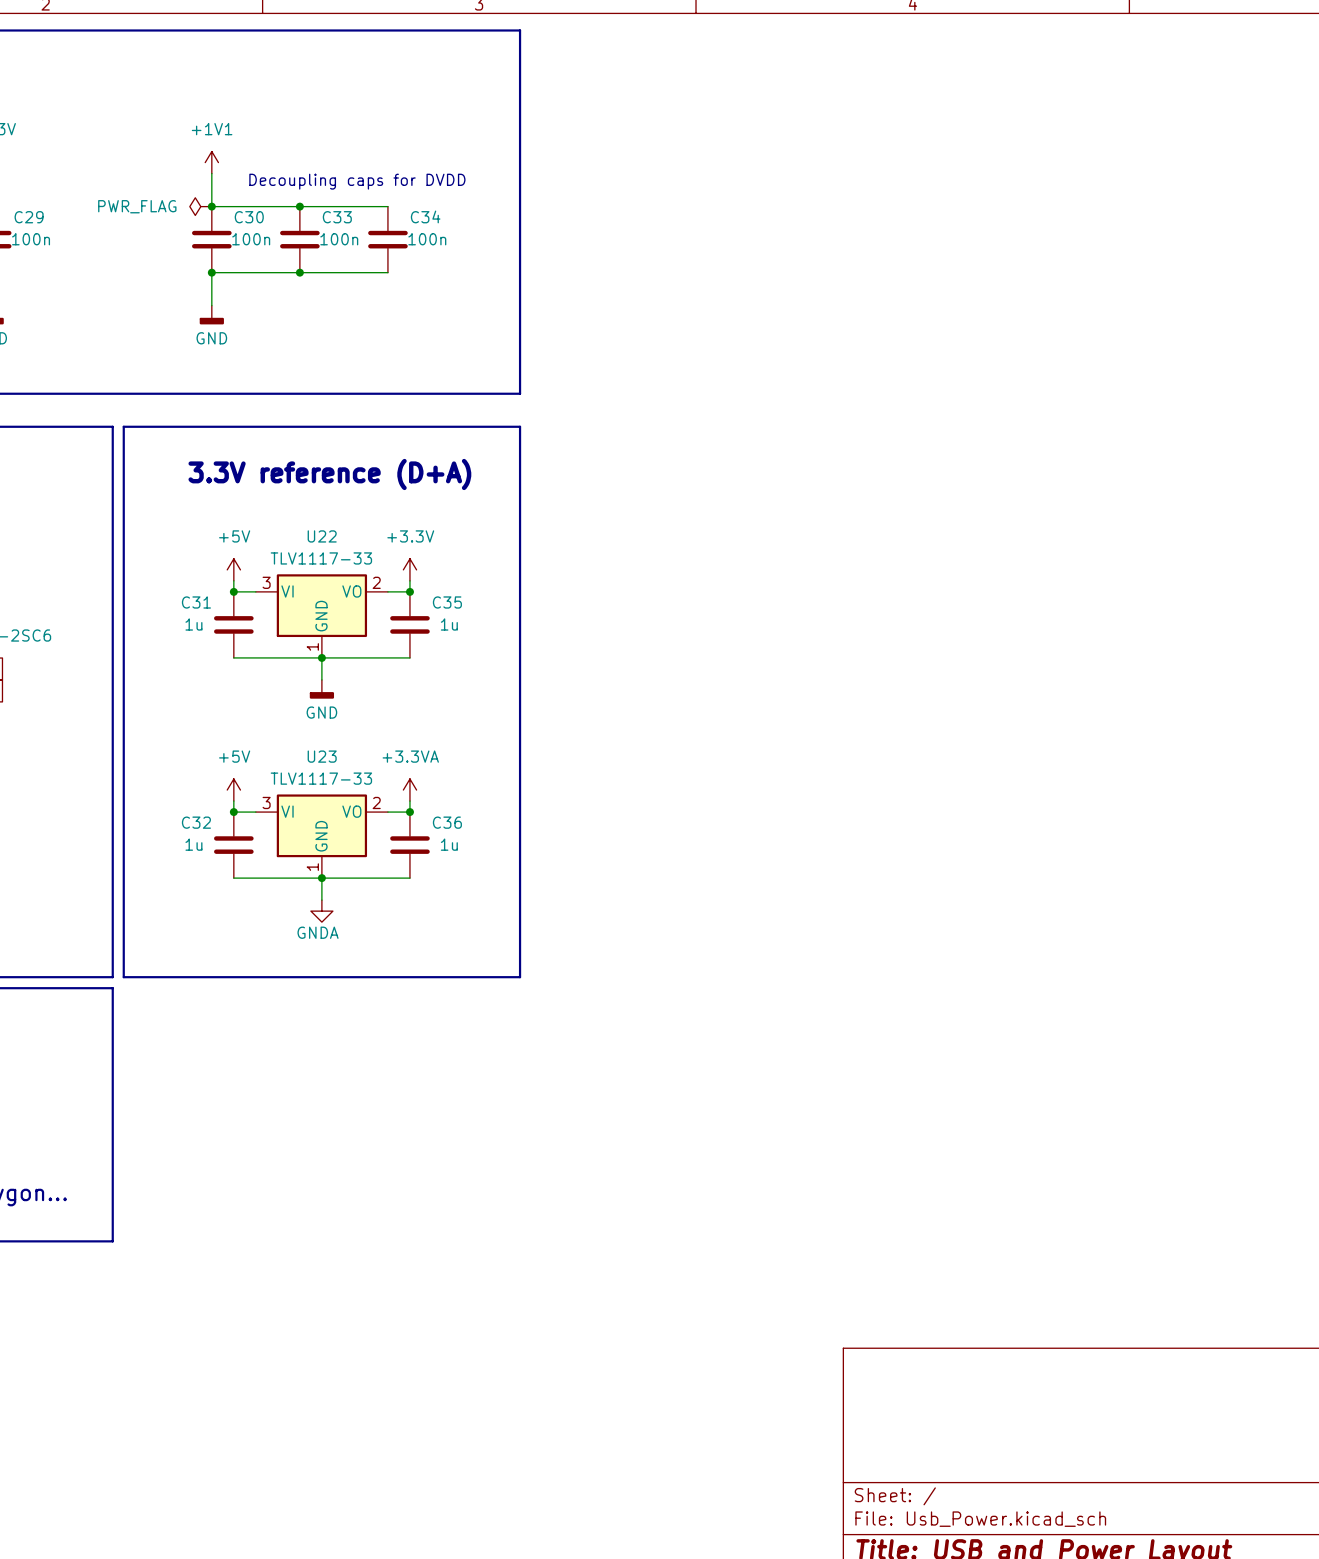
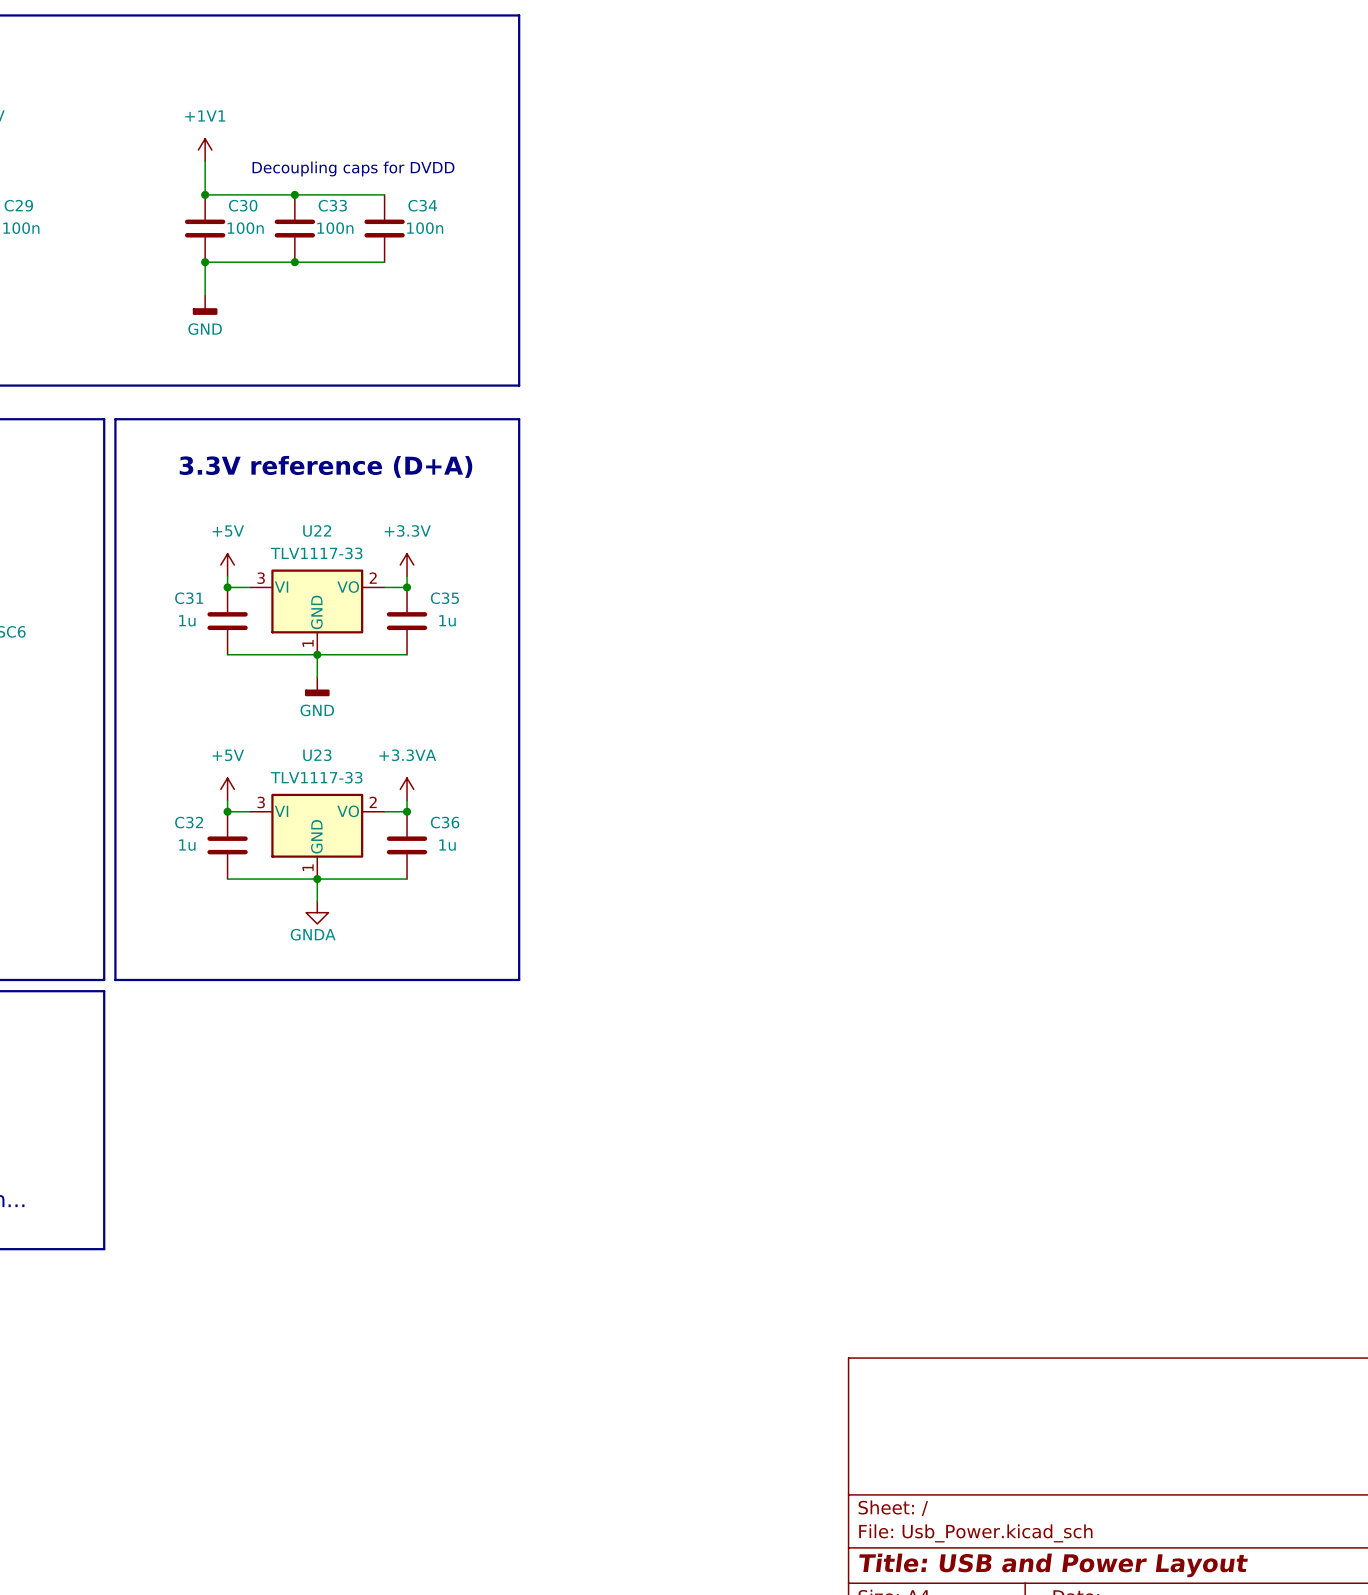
power symbol: PWR_FLAG (200, 206) -> none

